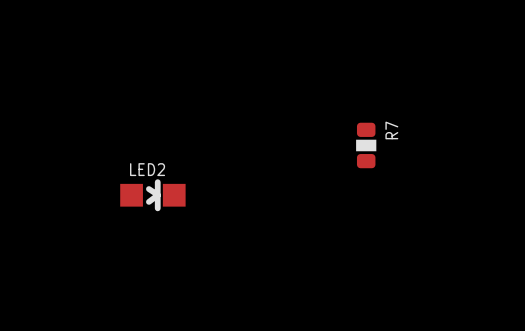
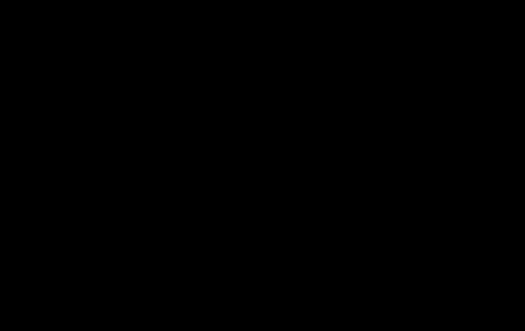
R7: (366, 145) -> none
LED2: (152, 195) -> none

